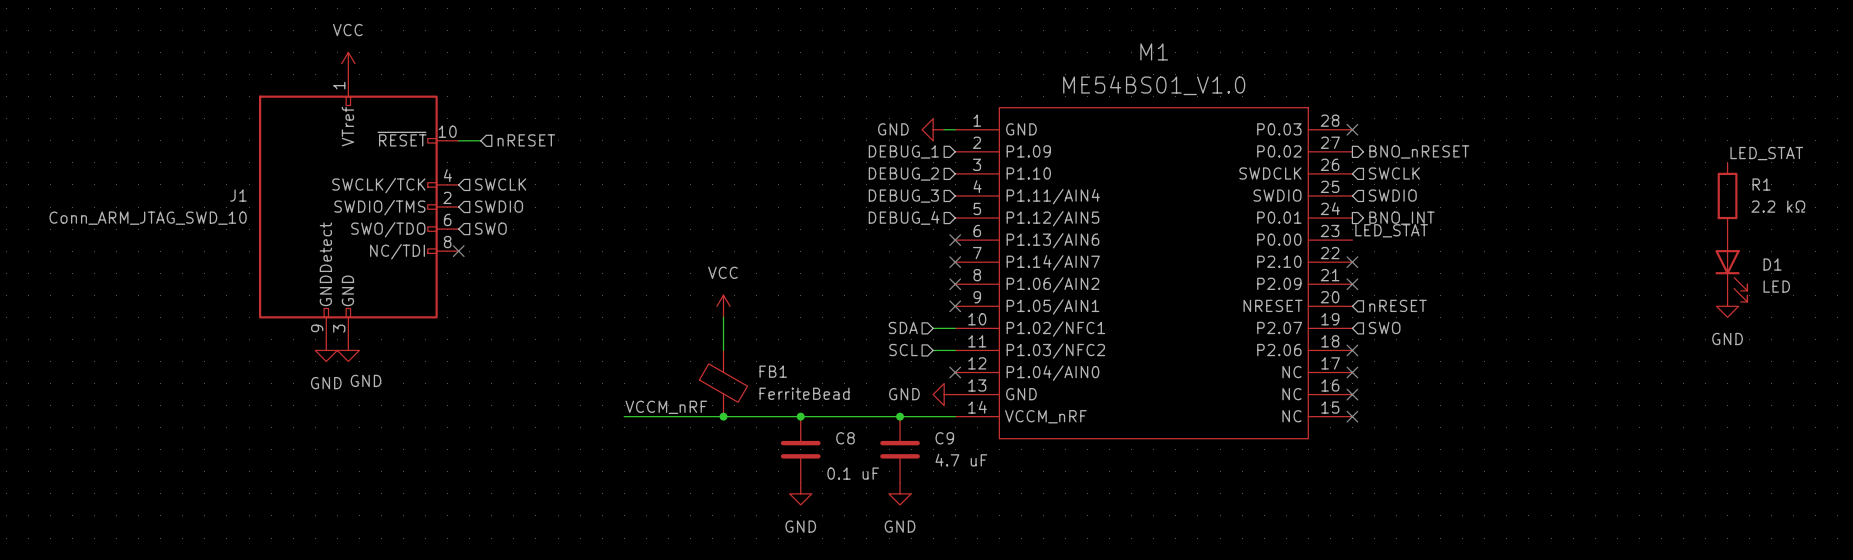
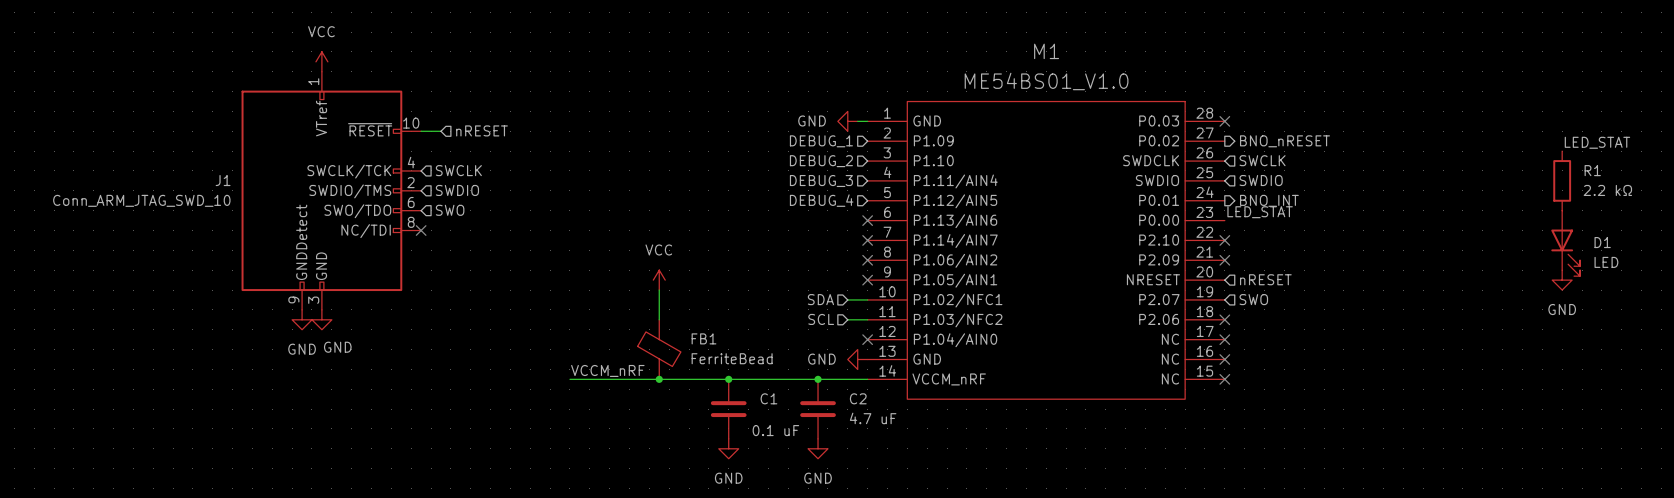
C8 name: C8 (845, 438) -> C1 (768, 398)
C9 name: C9 (944, 438) -> C2 (858, 398)

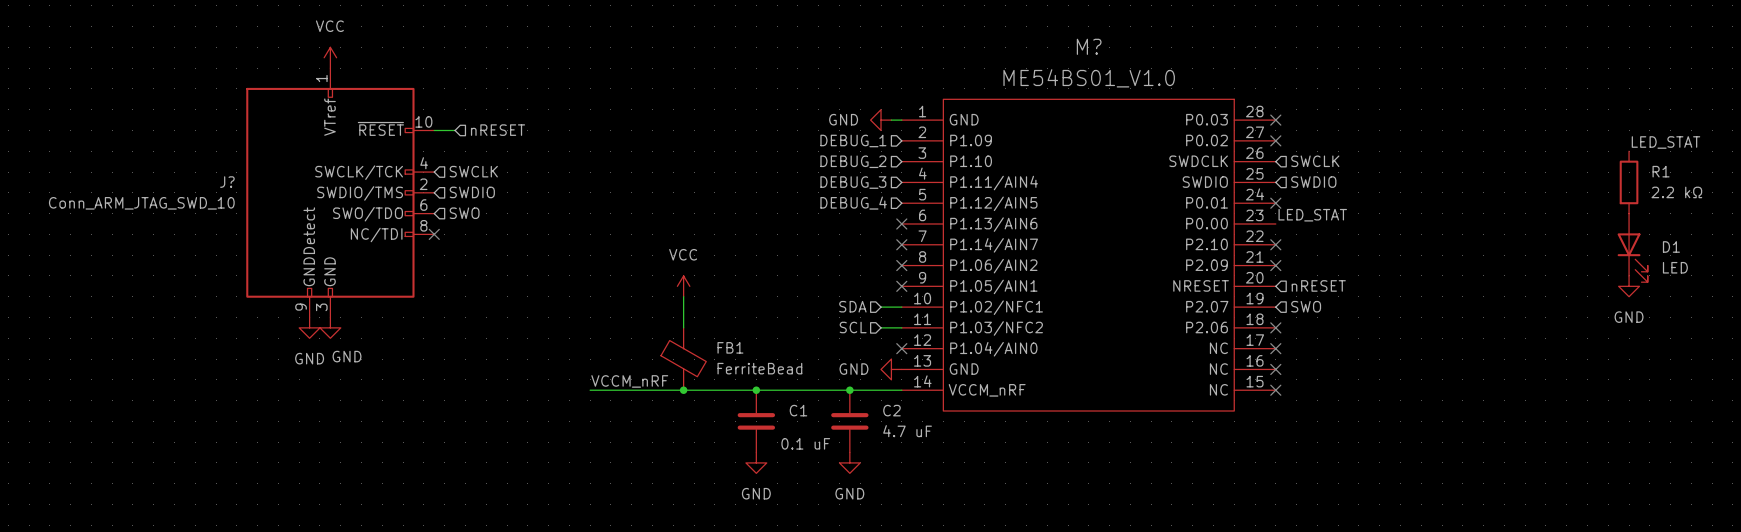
M1 name: M1 (1046, 51) -> M? (1089, 46)
no-connect mark: none -> (1275, 140)
hierarchical label: BNO_nRESET (1284, 141) -> none
J1 name: J1 (223, 180) -> J? (227, 182)
no-connect mark: none -> (1275, 203)
hierarchical label: BNO_INT (1269, 200) -> none

